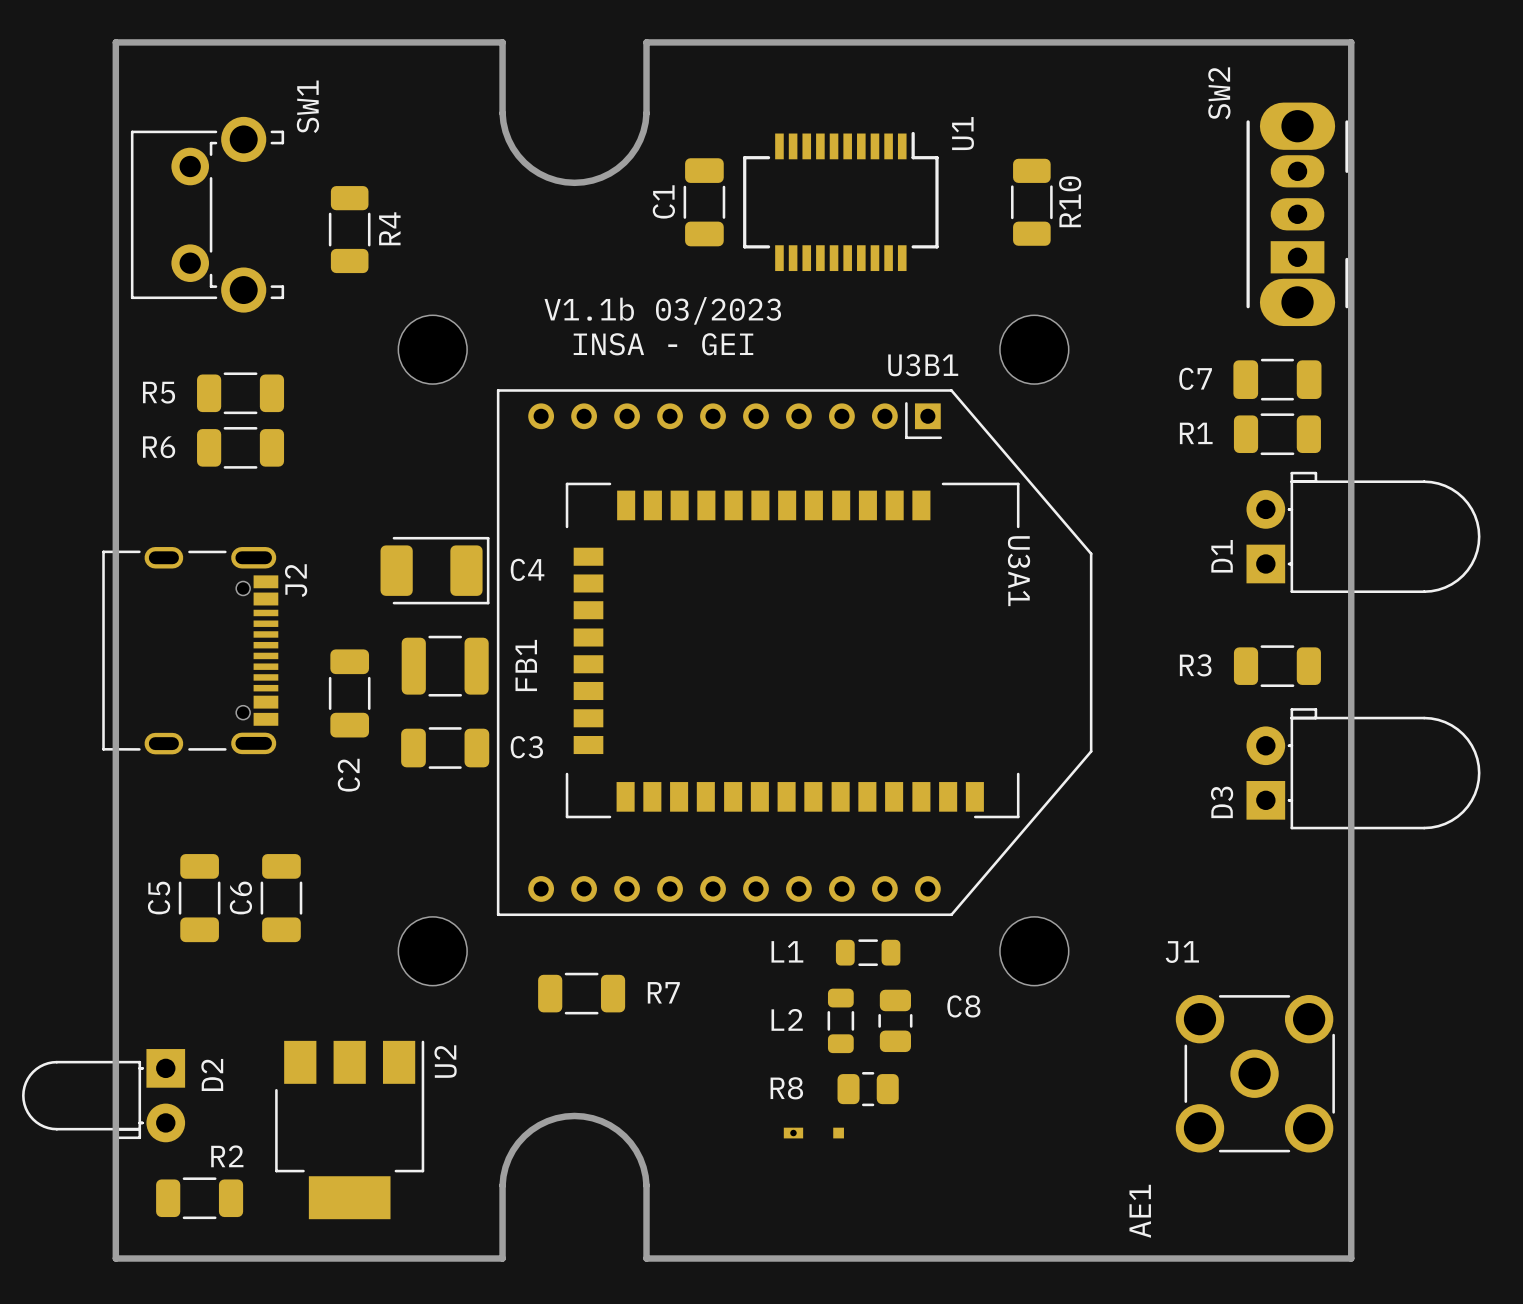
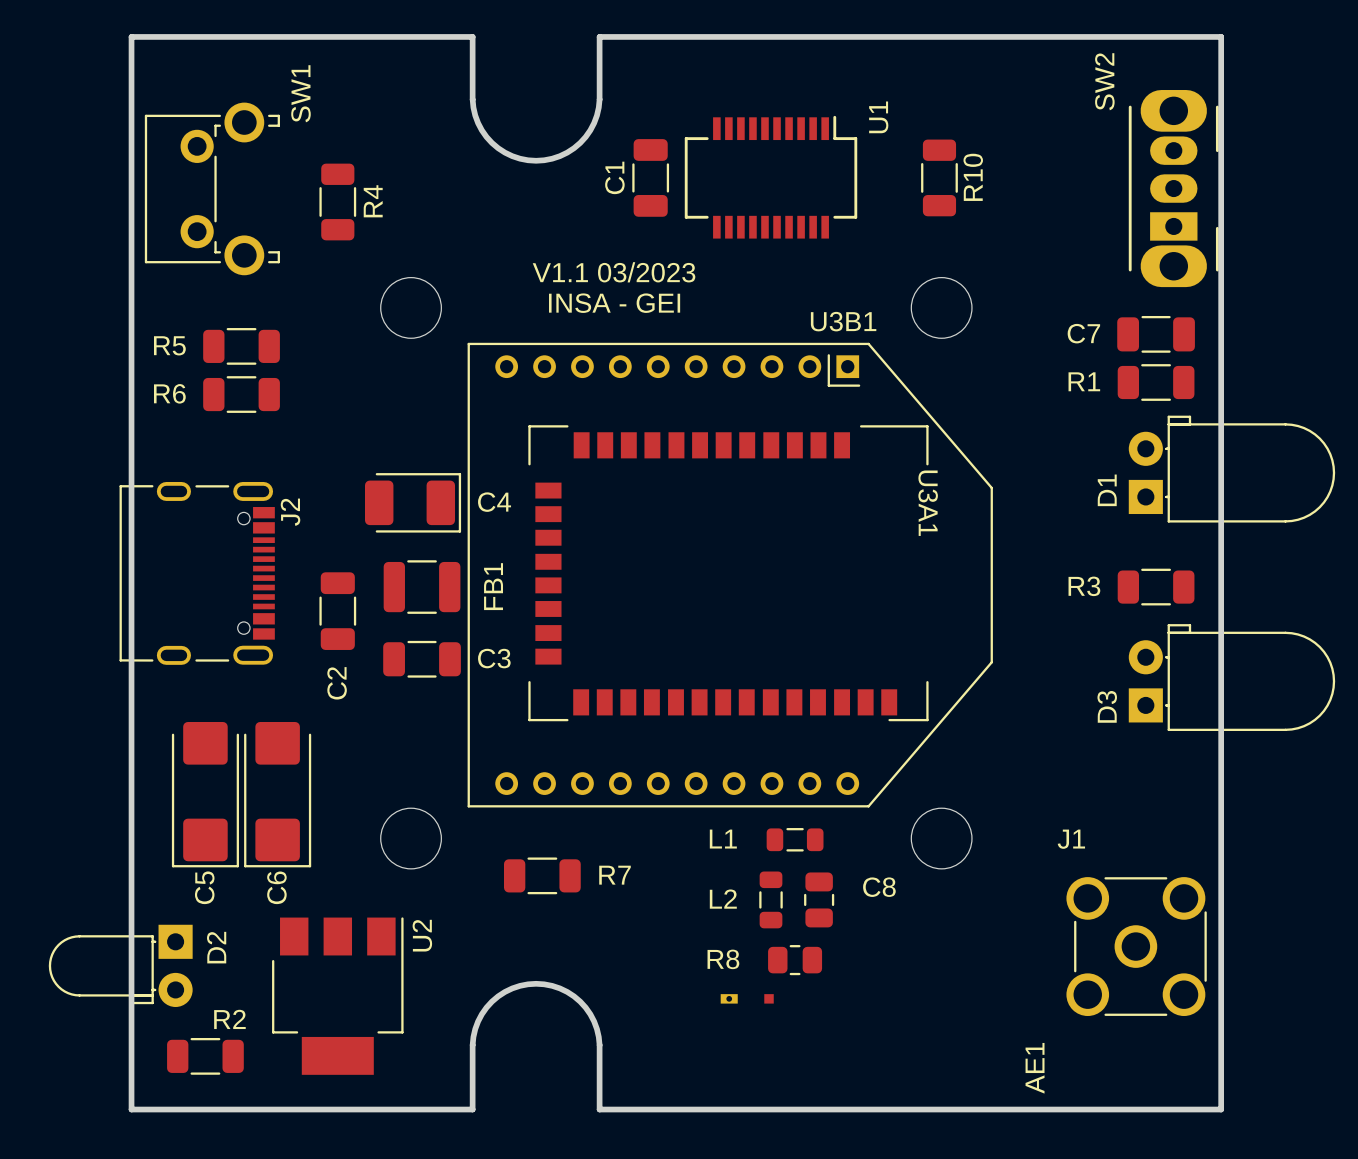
text: V1.1b 03/2023 (662, 310) -> V1.1 03/2023 (614, 272)
C5 footprint: [178, 854, 221, 943] -> [171, 721, 239, 868]
C6 footprint: [260, 854, 303, 943] -> [244, 721, 312, 868]
C5 name position: C5 (159, 898) -> C5 (204, 887)
C6 name position: C6 (240, 898) -> C6 (276, 887)

